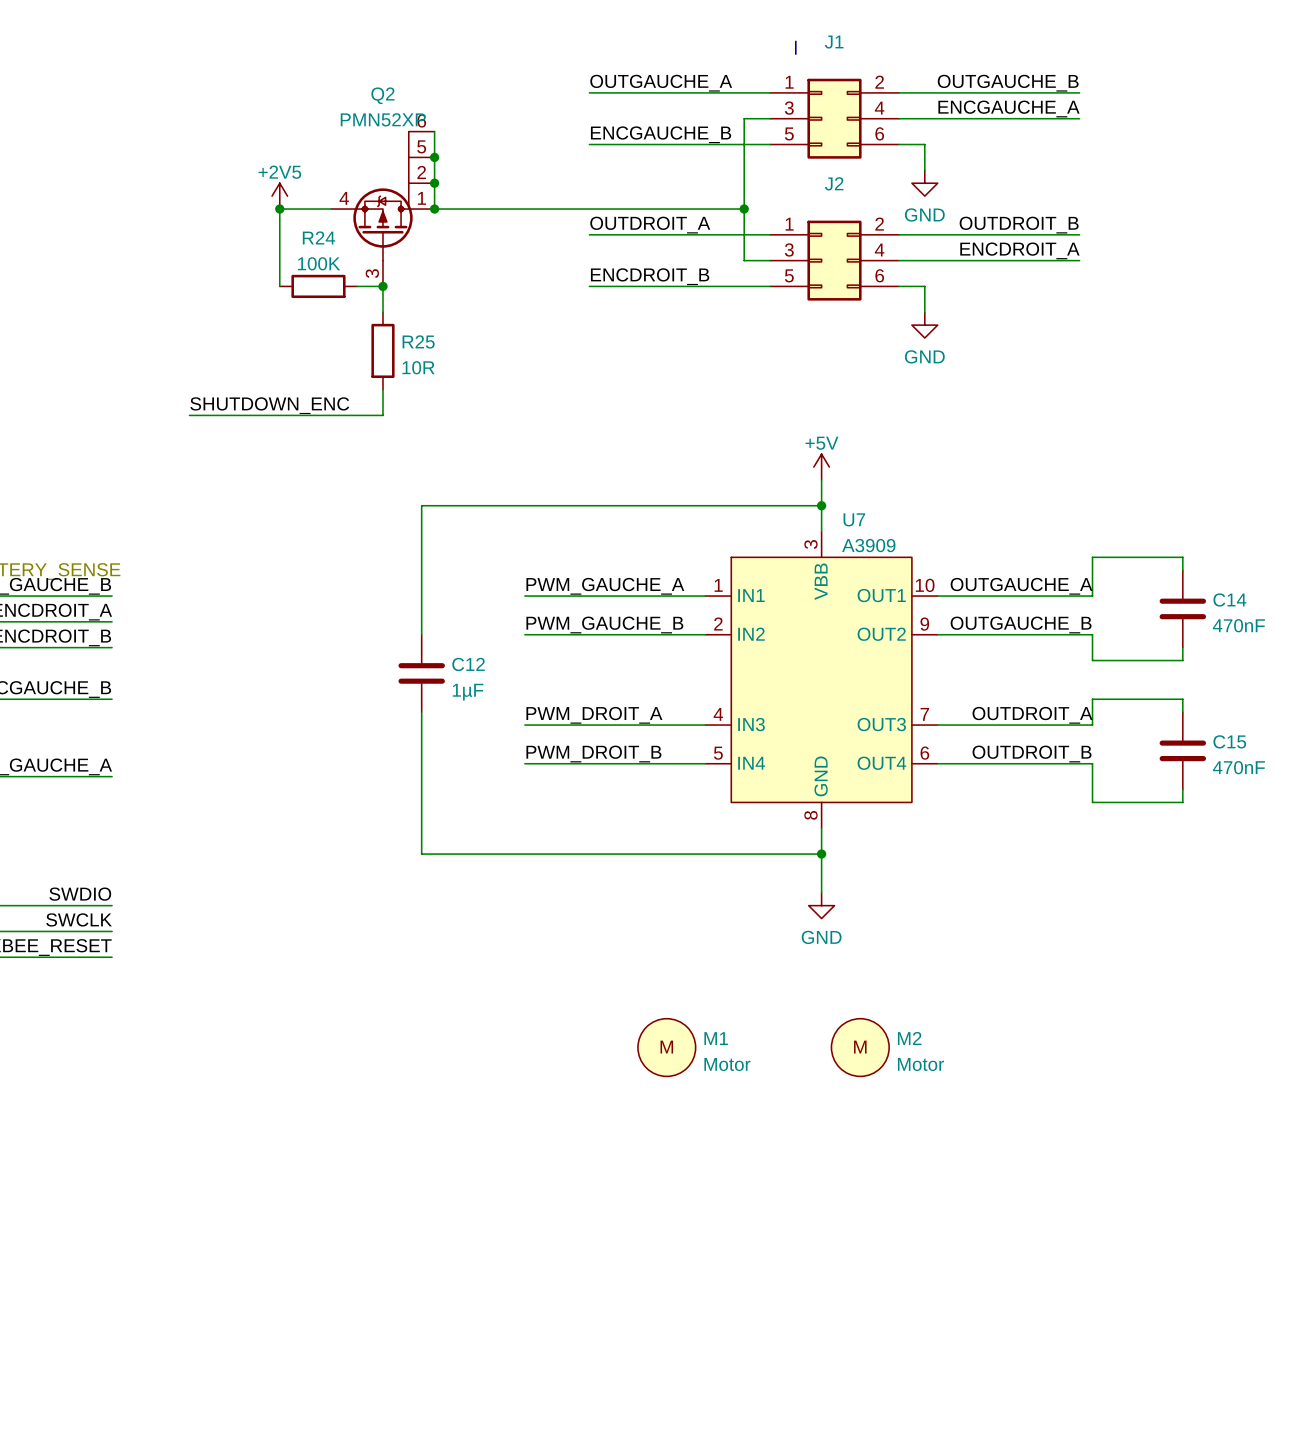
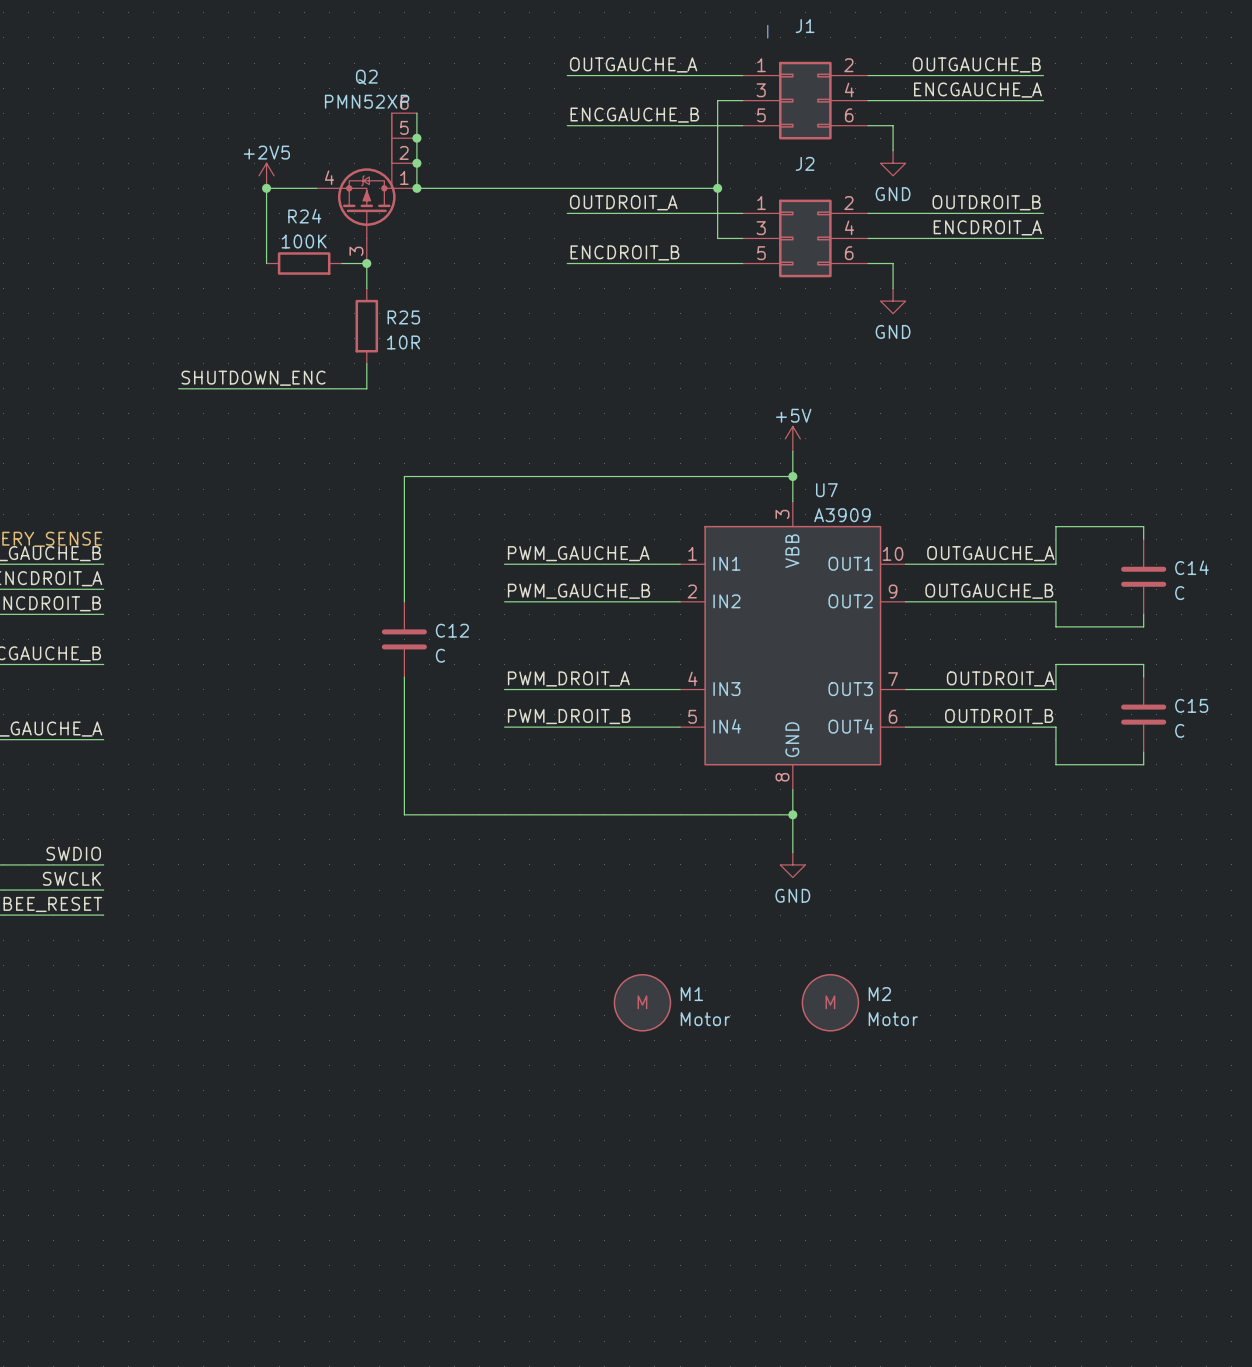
C14 value: 470nF (1238, 625) -> C (1179, 593)
C12 value: 1µF (468, 692) -> C (440, 655)
C15 value: 470nF (1238, 767) -> C (1179, 730)

